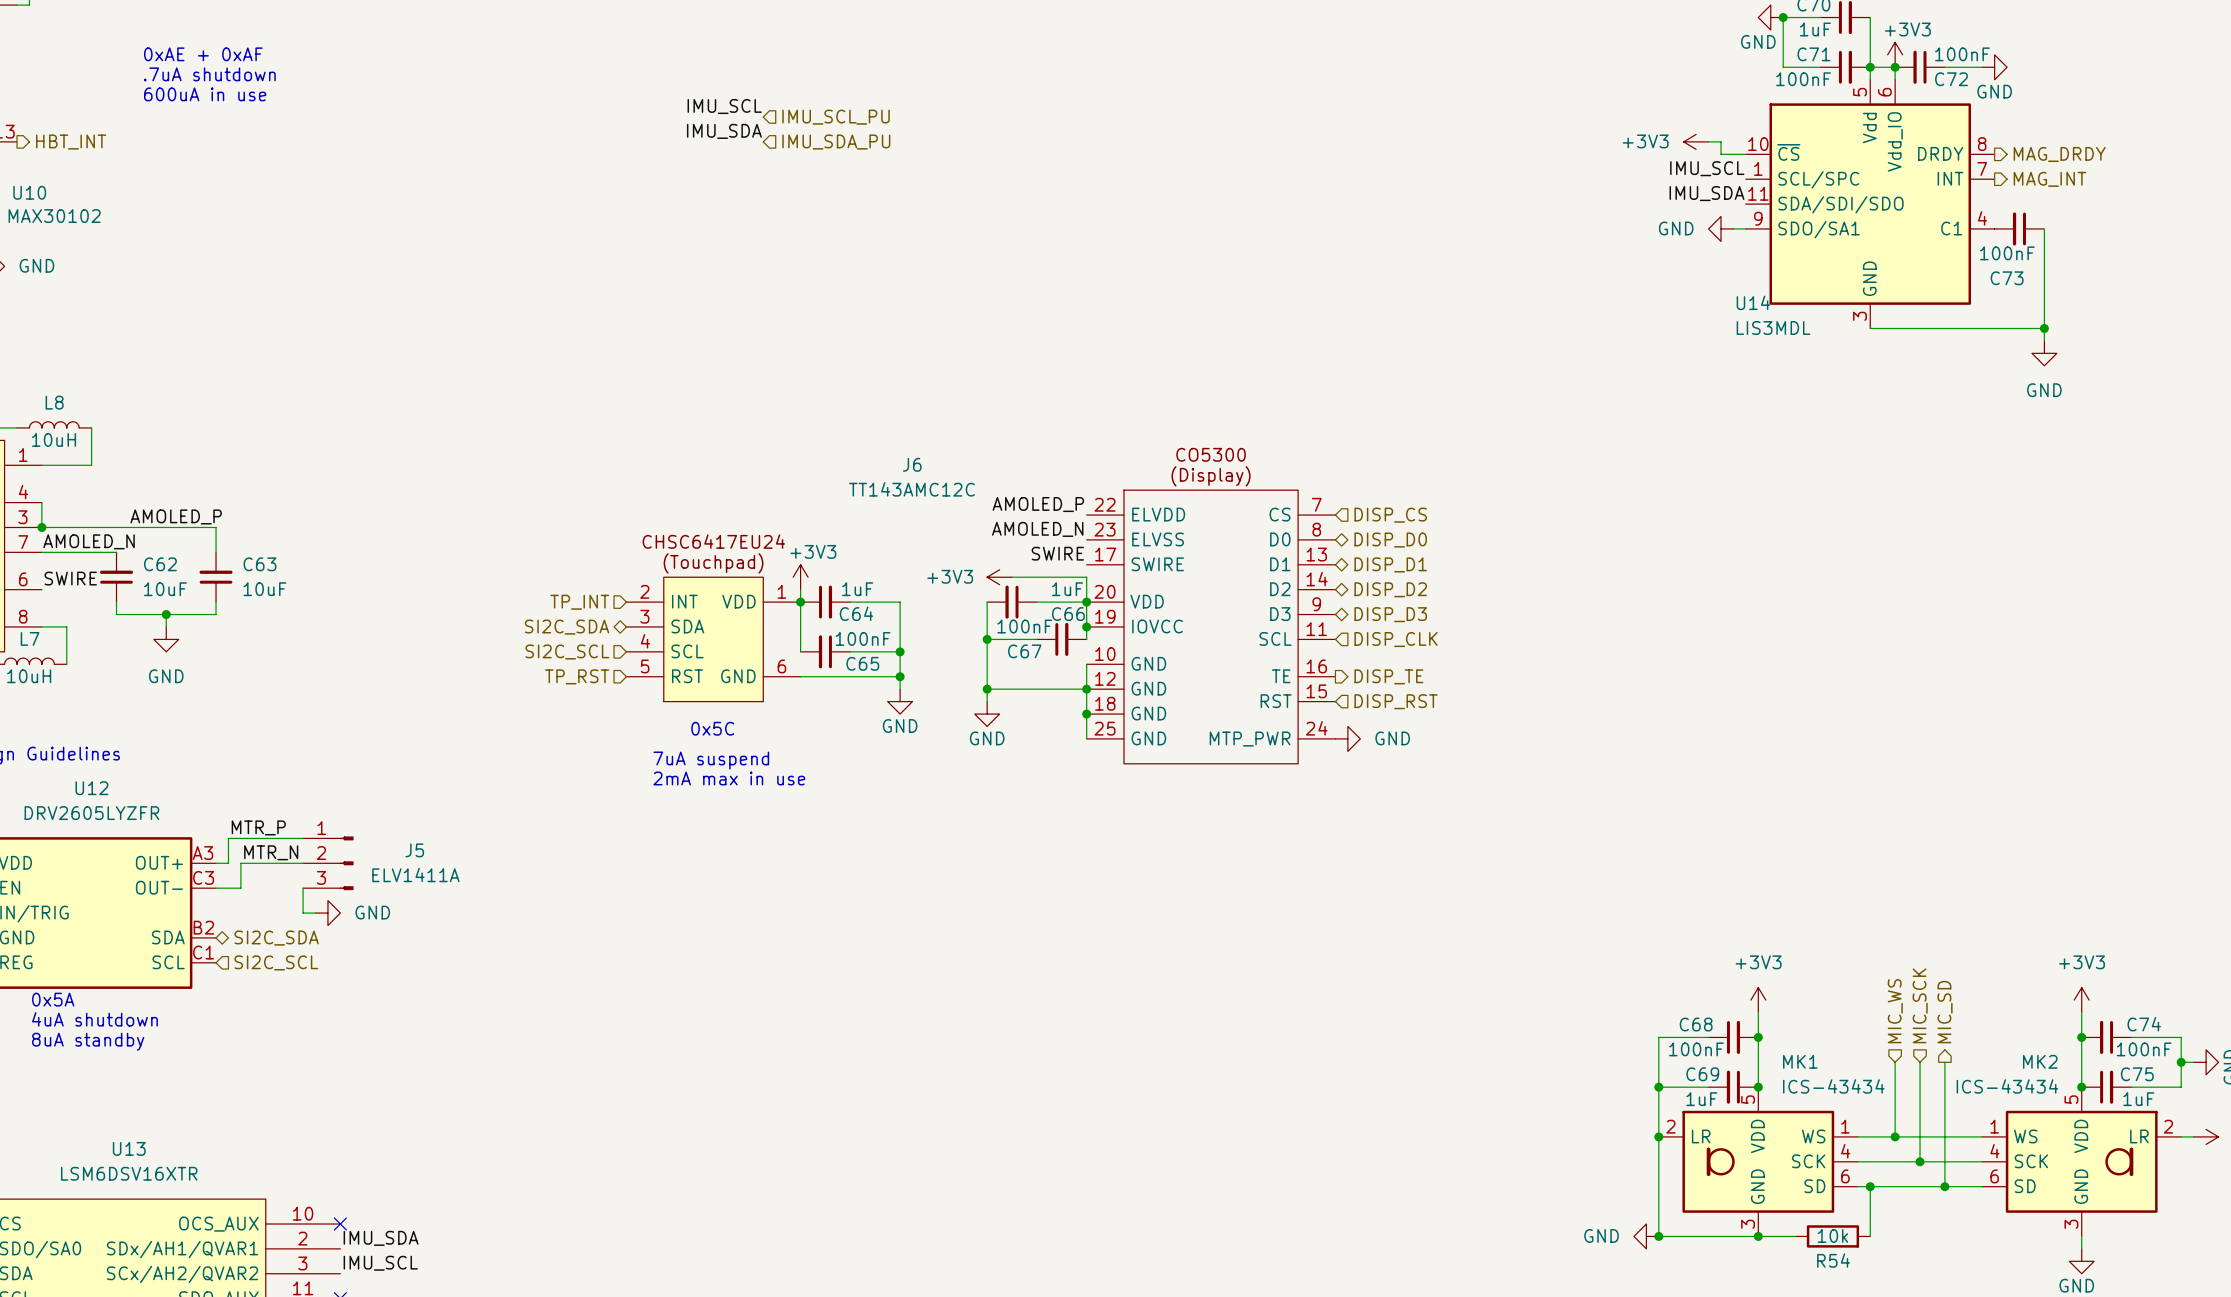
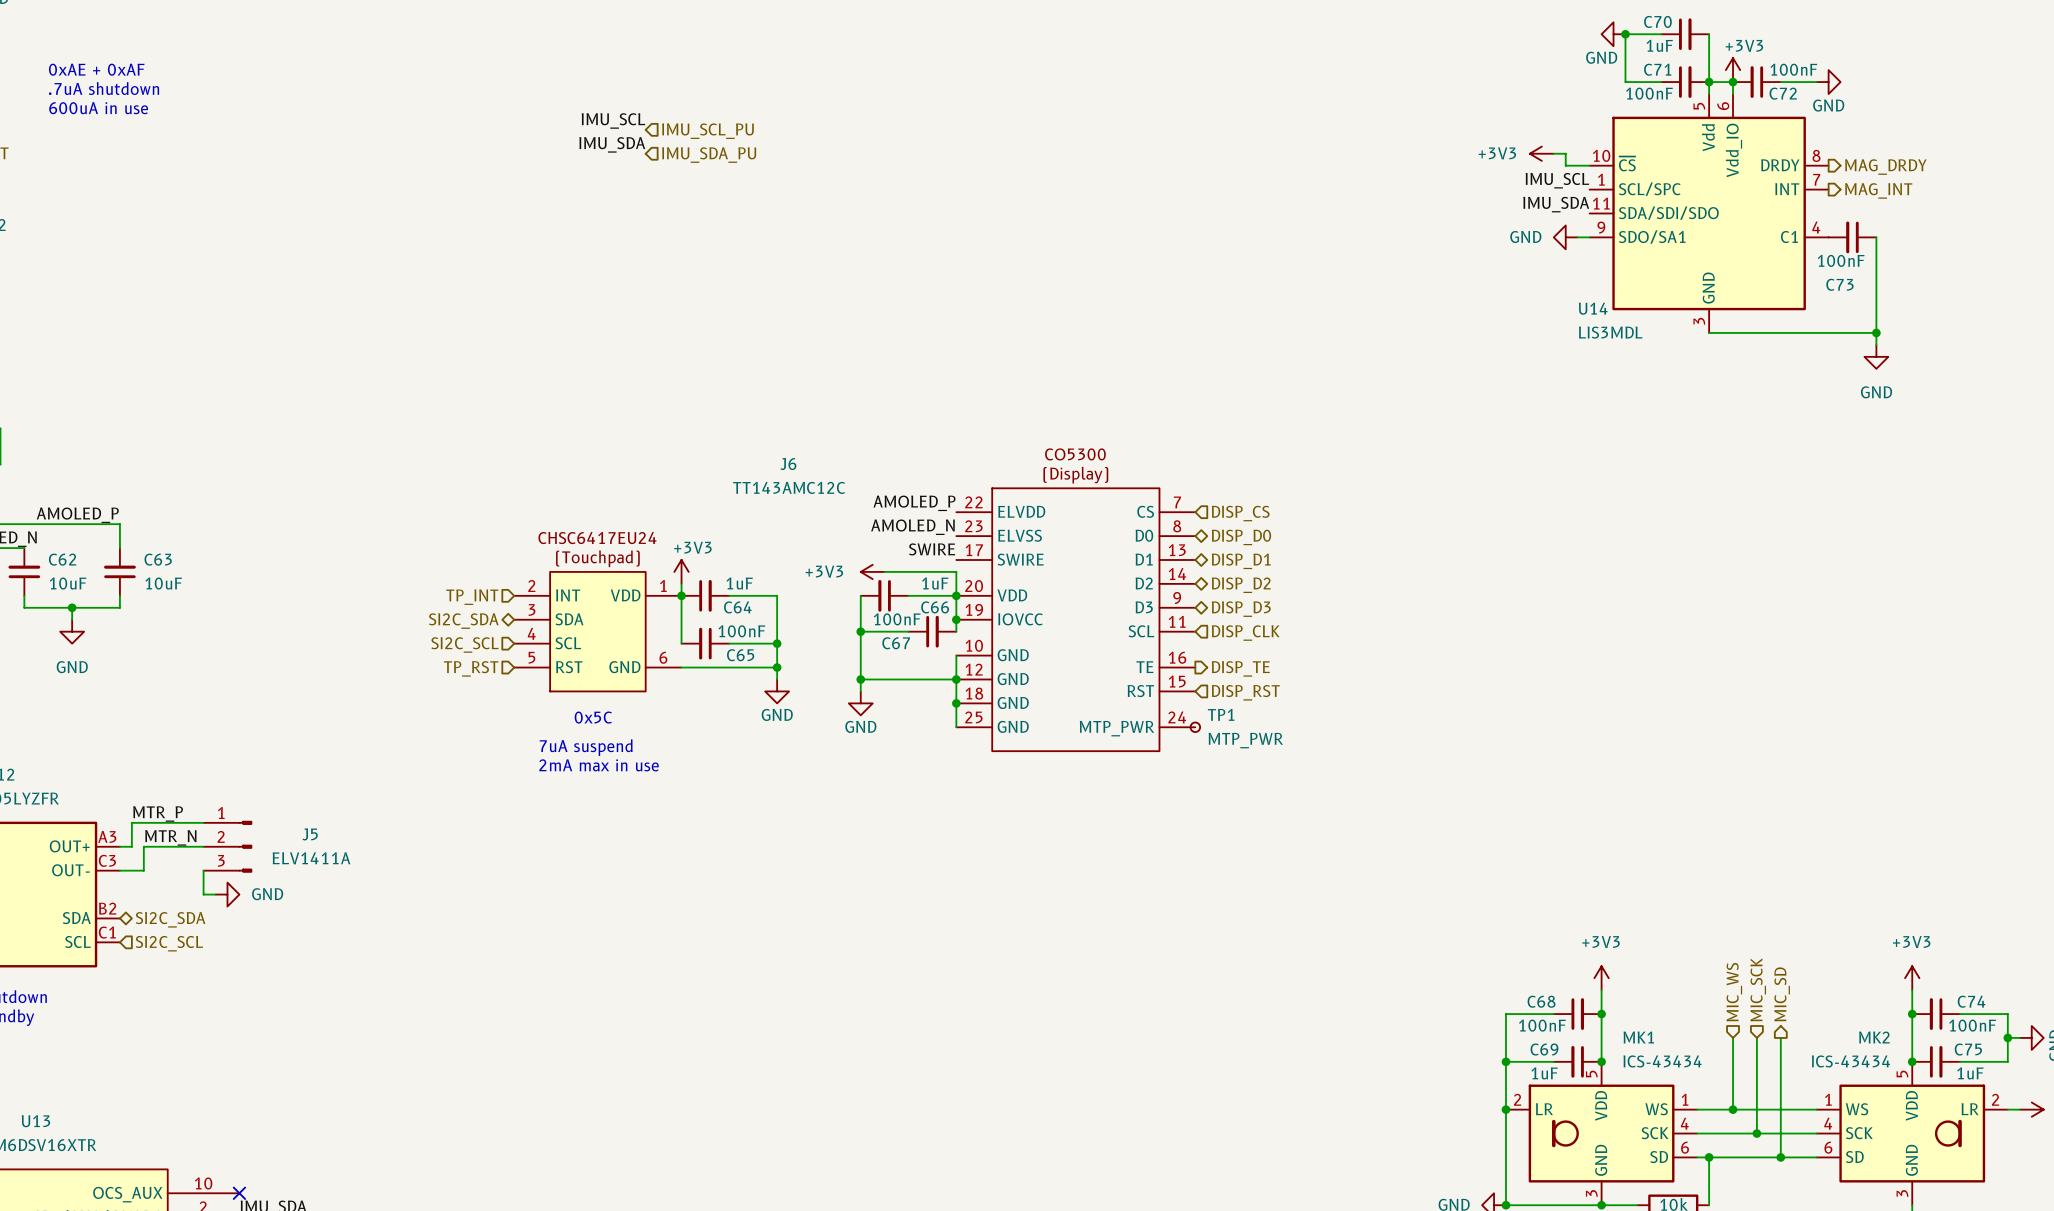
TP1: none -> MTP_PWR (1195, 727)
power symbol: GND (1347, 738) -> none

